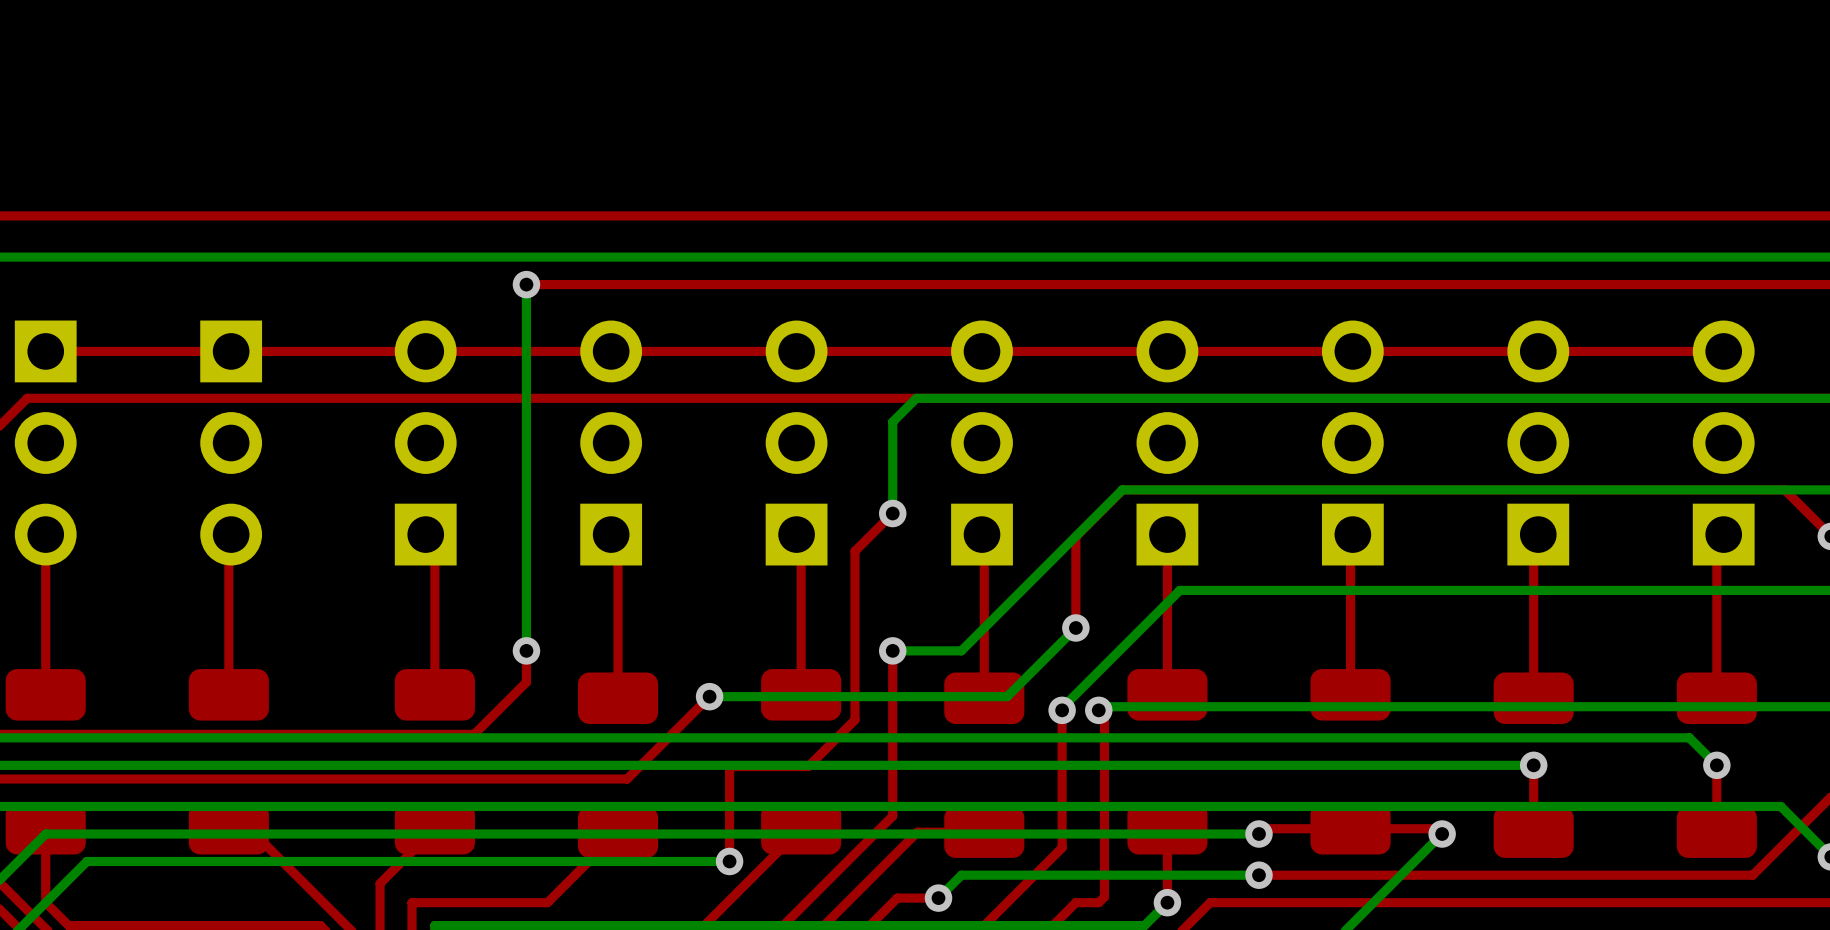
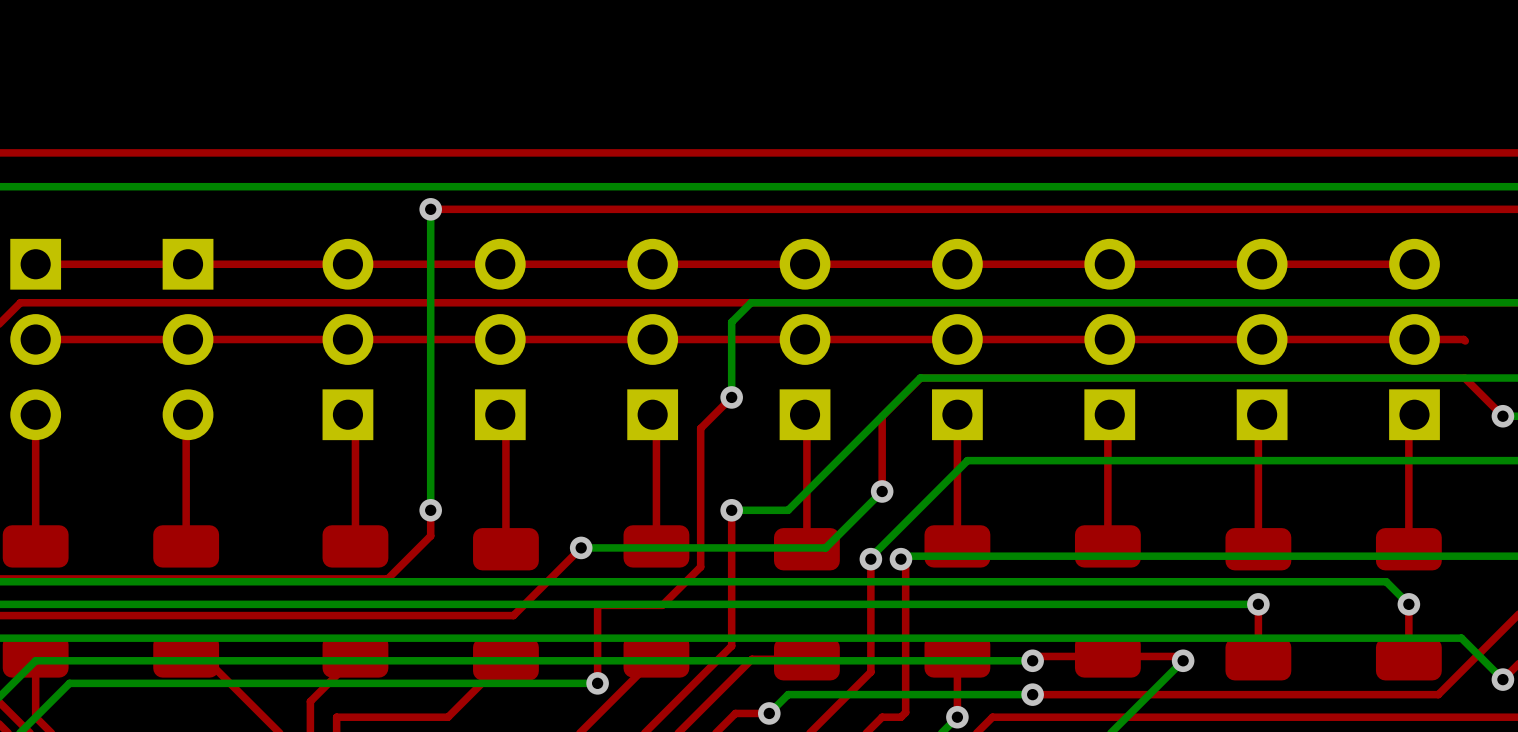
top track: none -> (35, 339) (1463, 339) (1465, 341)

